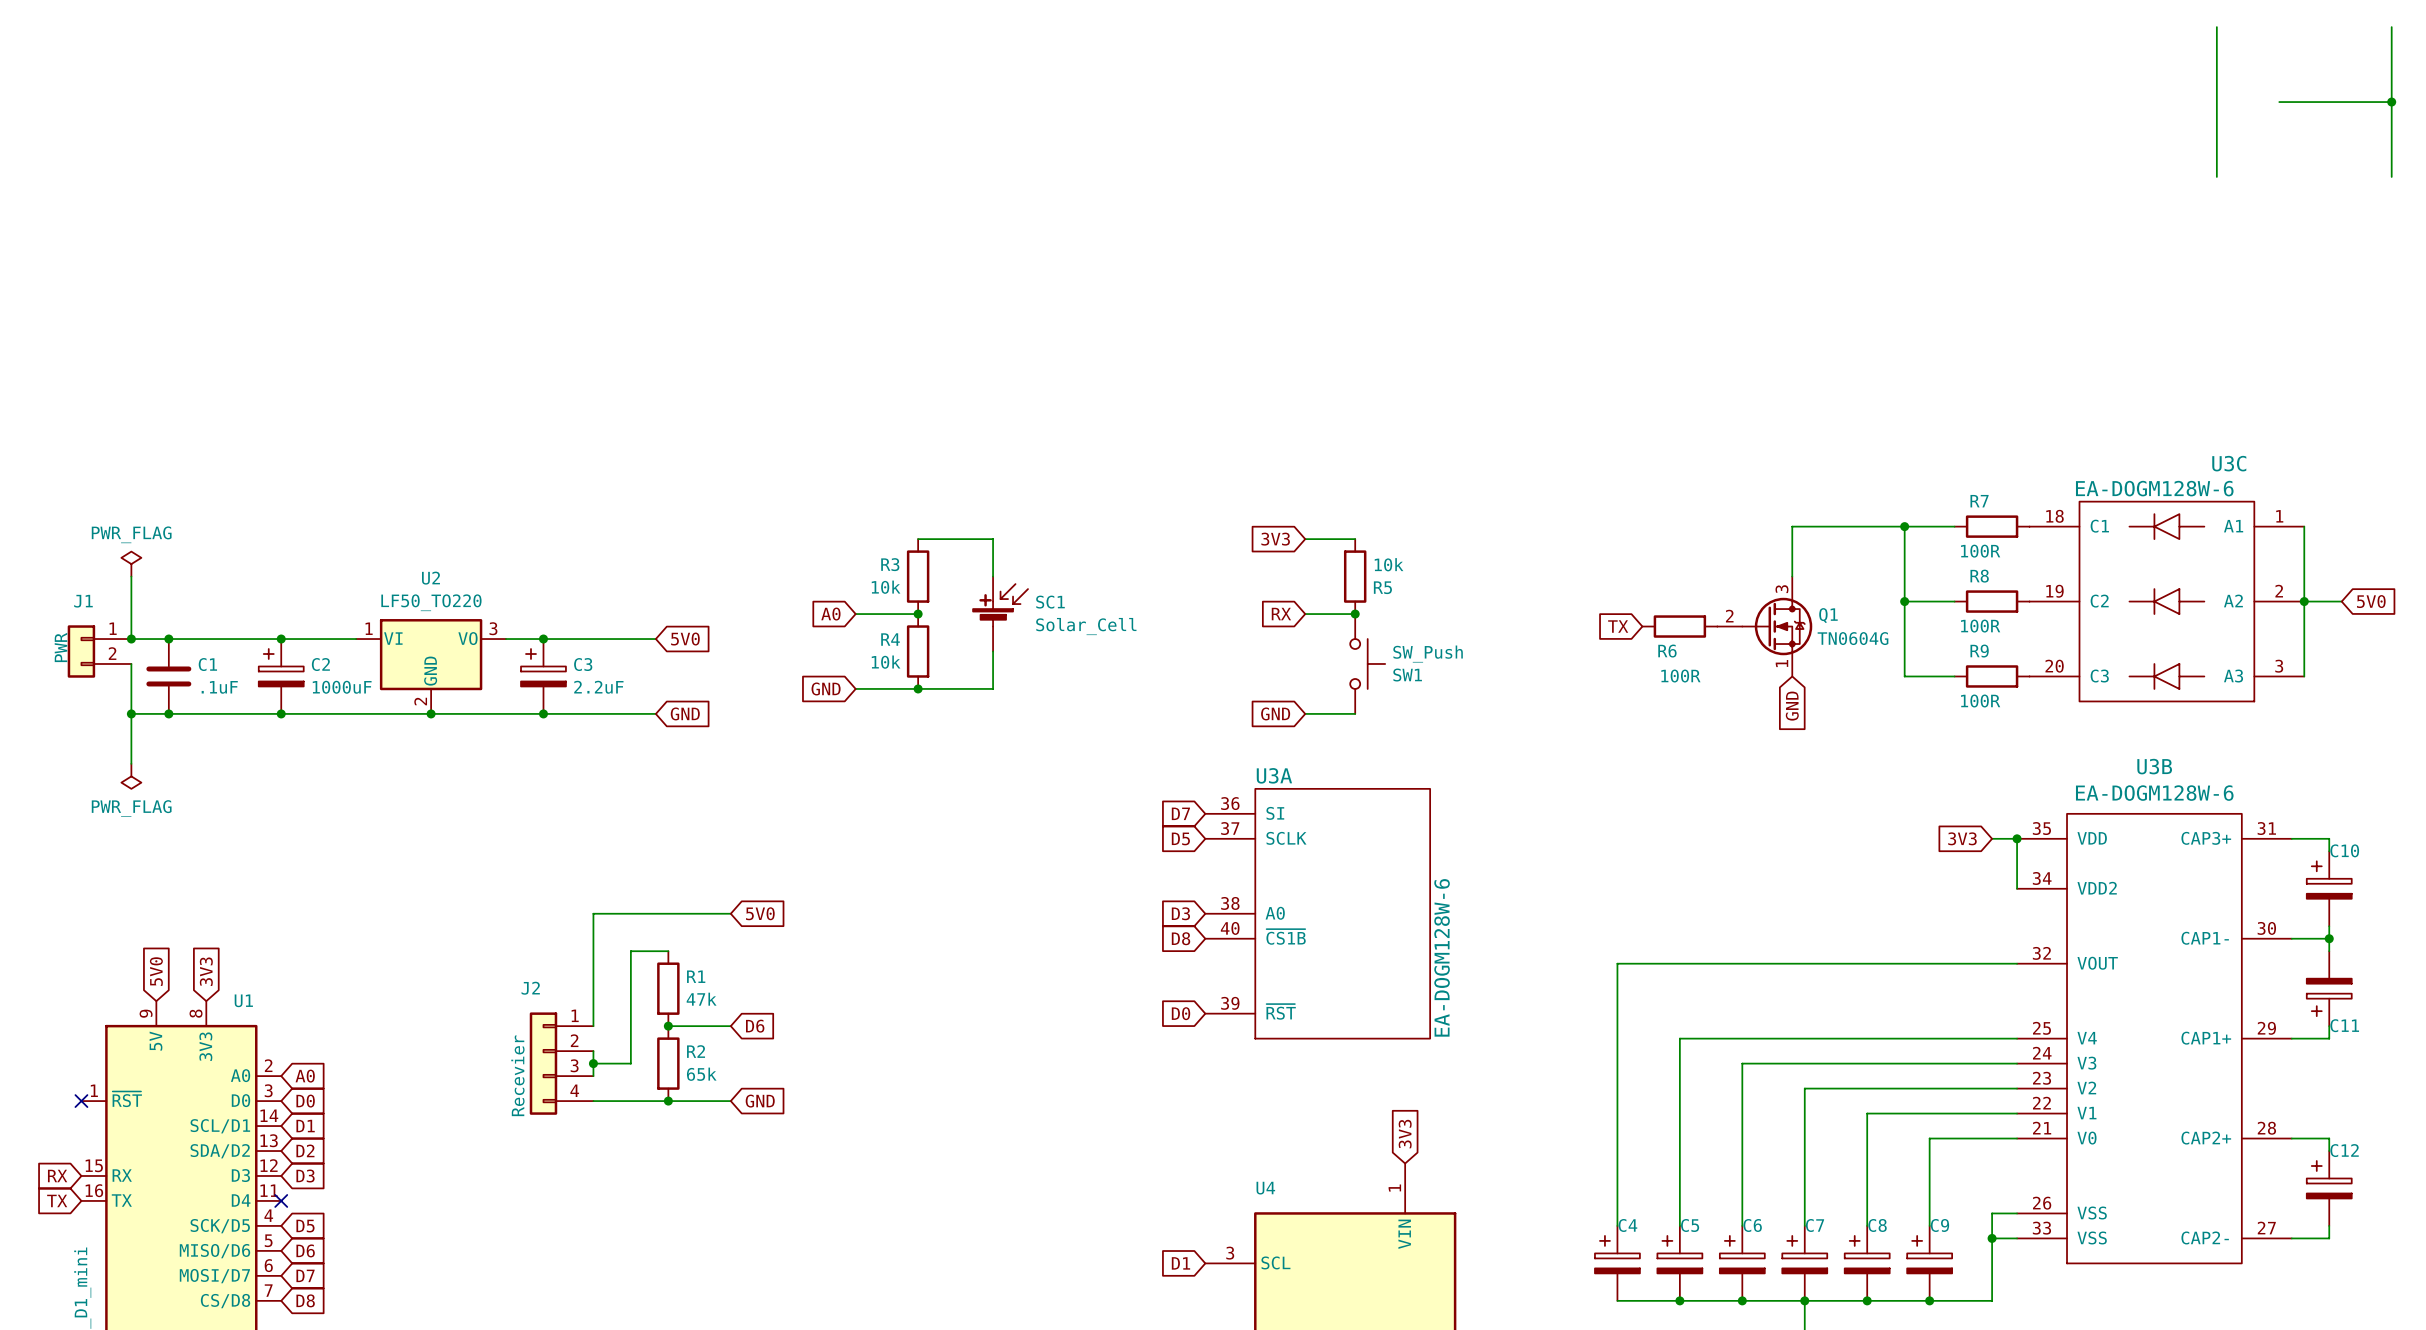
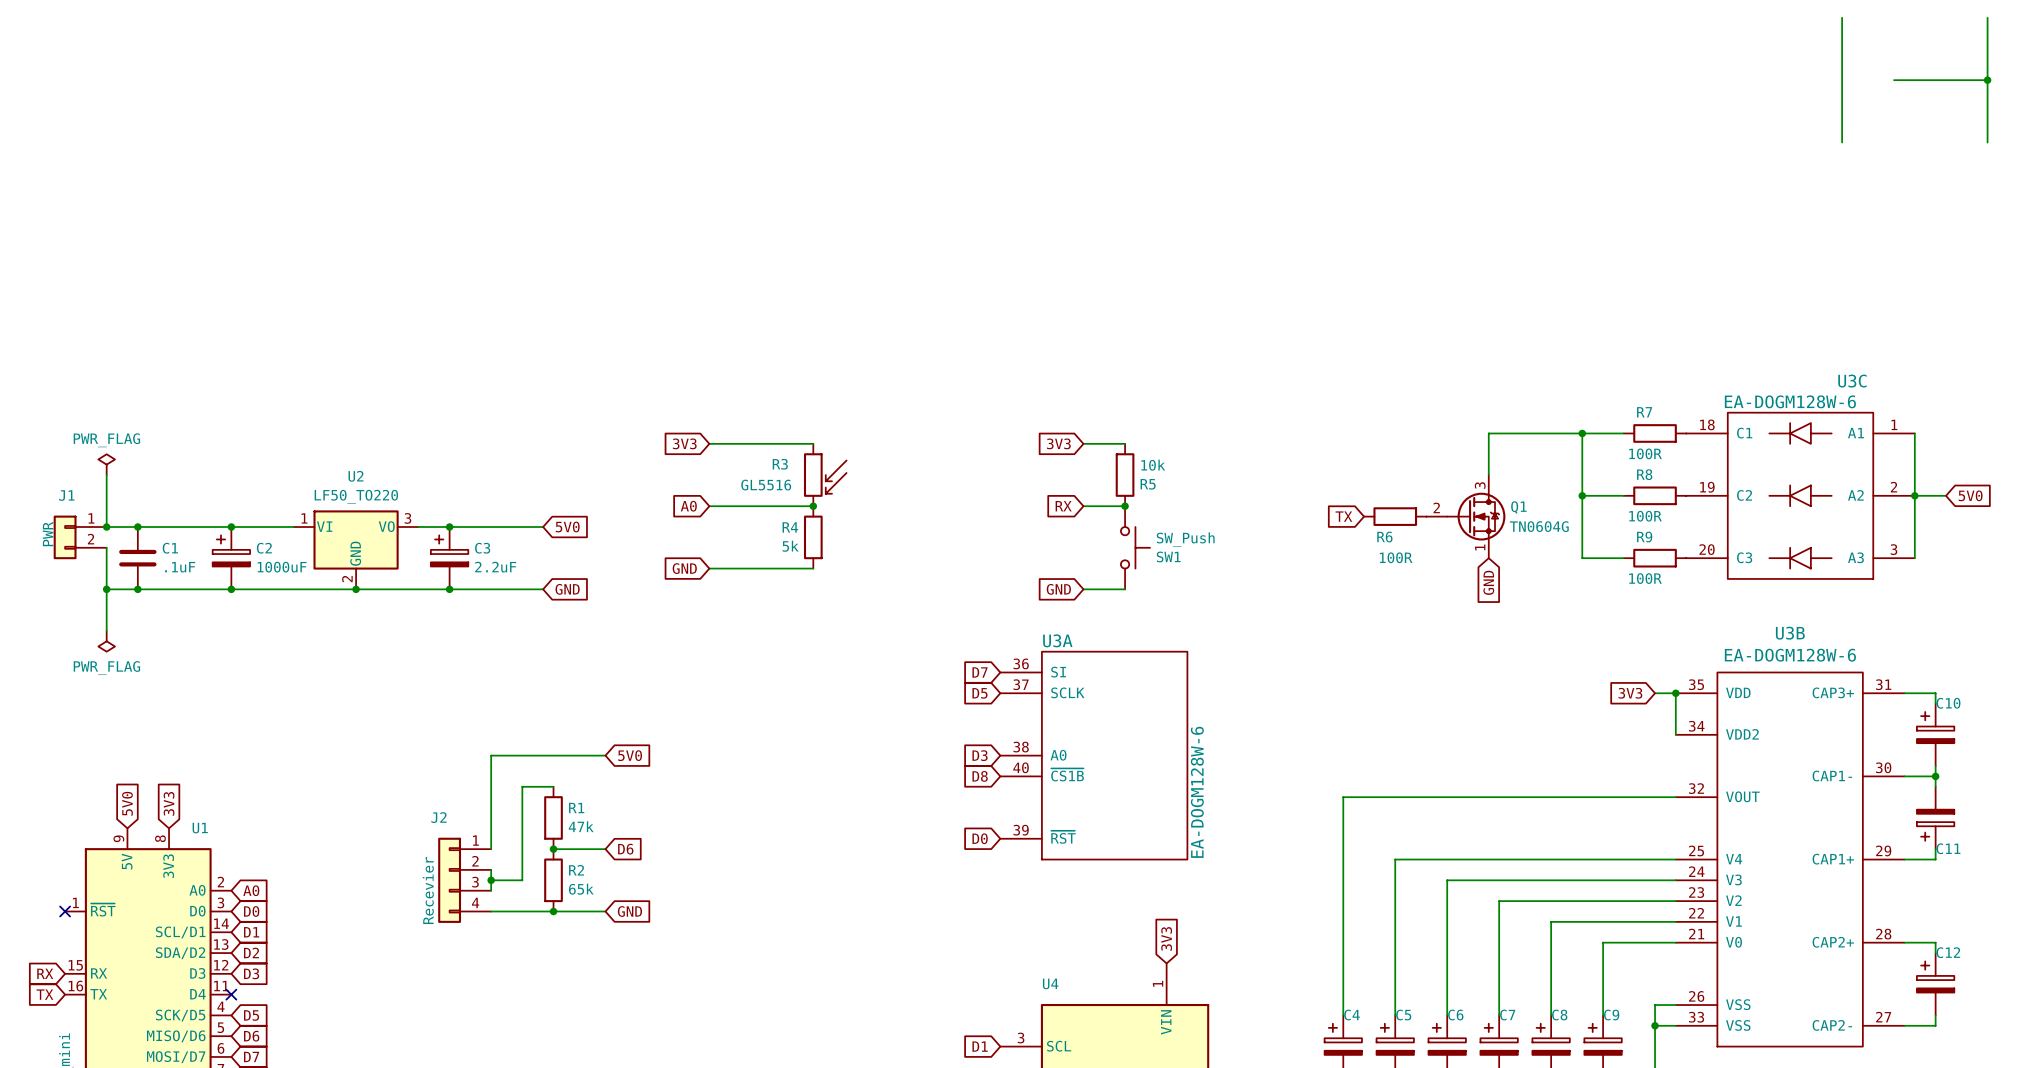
global label: none -> 3V3 (684, 443)
wire: none -> (709, 443) (761, 443)
R3 symbol: [906, 539, 930, 615] -> [803, 443, 847, 507]
wire: (980, 539) (993, 539) (993, 576) -> none
R3 value: 10k (886, 587) -> GL5516 (766, 485)
wire: none -> (761, 506) (813, 506)
junction: (918, 614) -> none
junction: none -> (813, 506)
SC1: Solar_Cell (1000, 614) -> none
R4 position: (918, 651) -> (813, 537)
wire: (993, 651) (993, 688) (980, 688) -> none
R4 value: 10k (886, 662) -> 5k (790, 546)
junction: (918, 688) -> none

